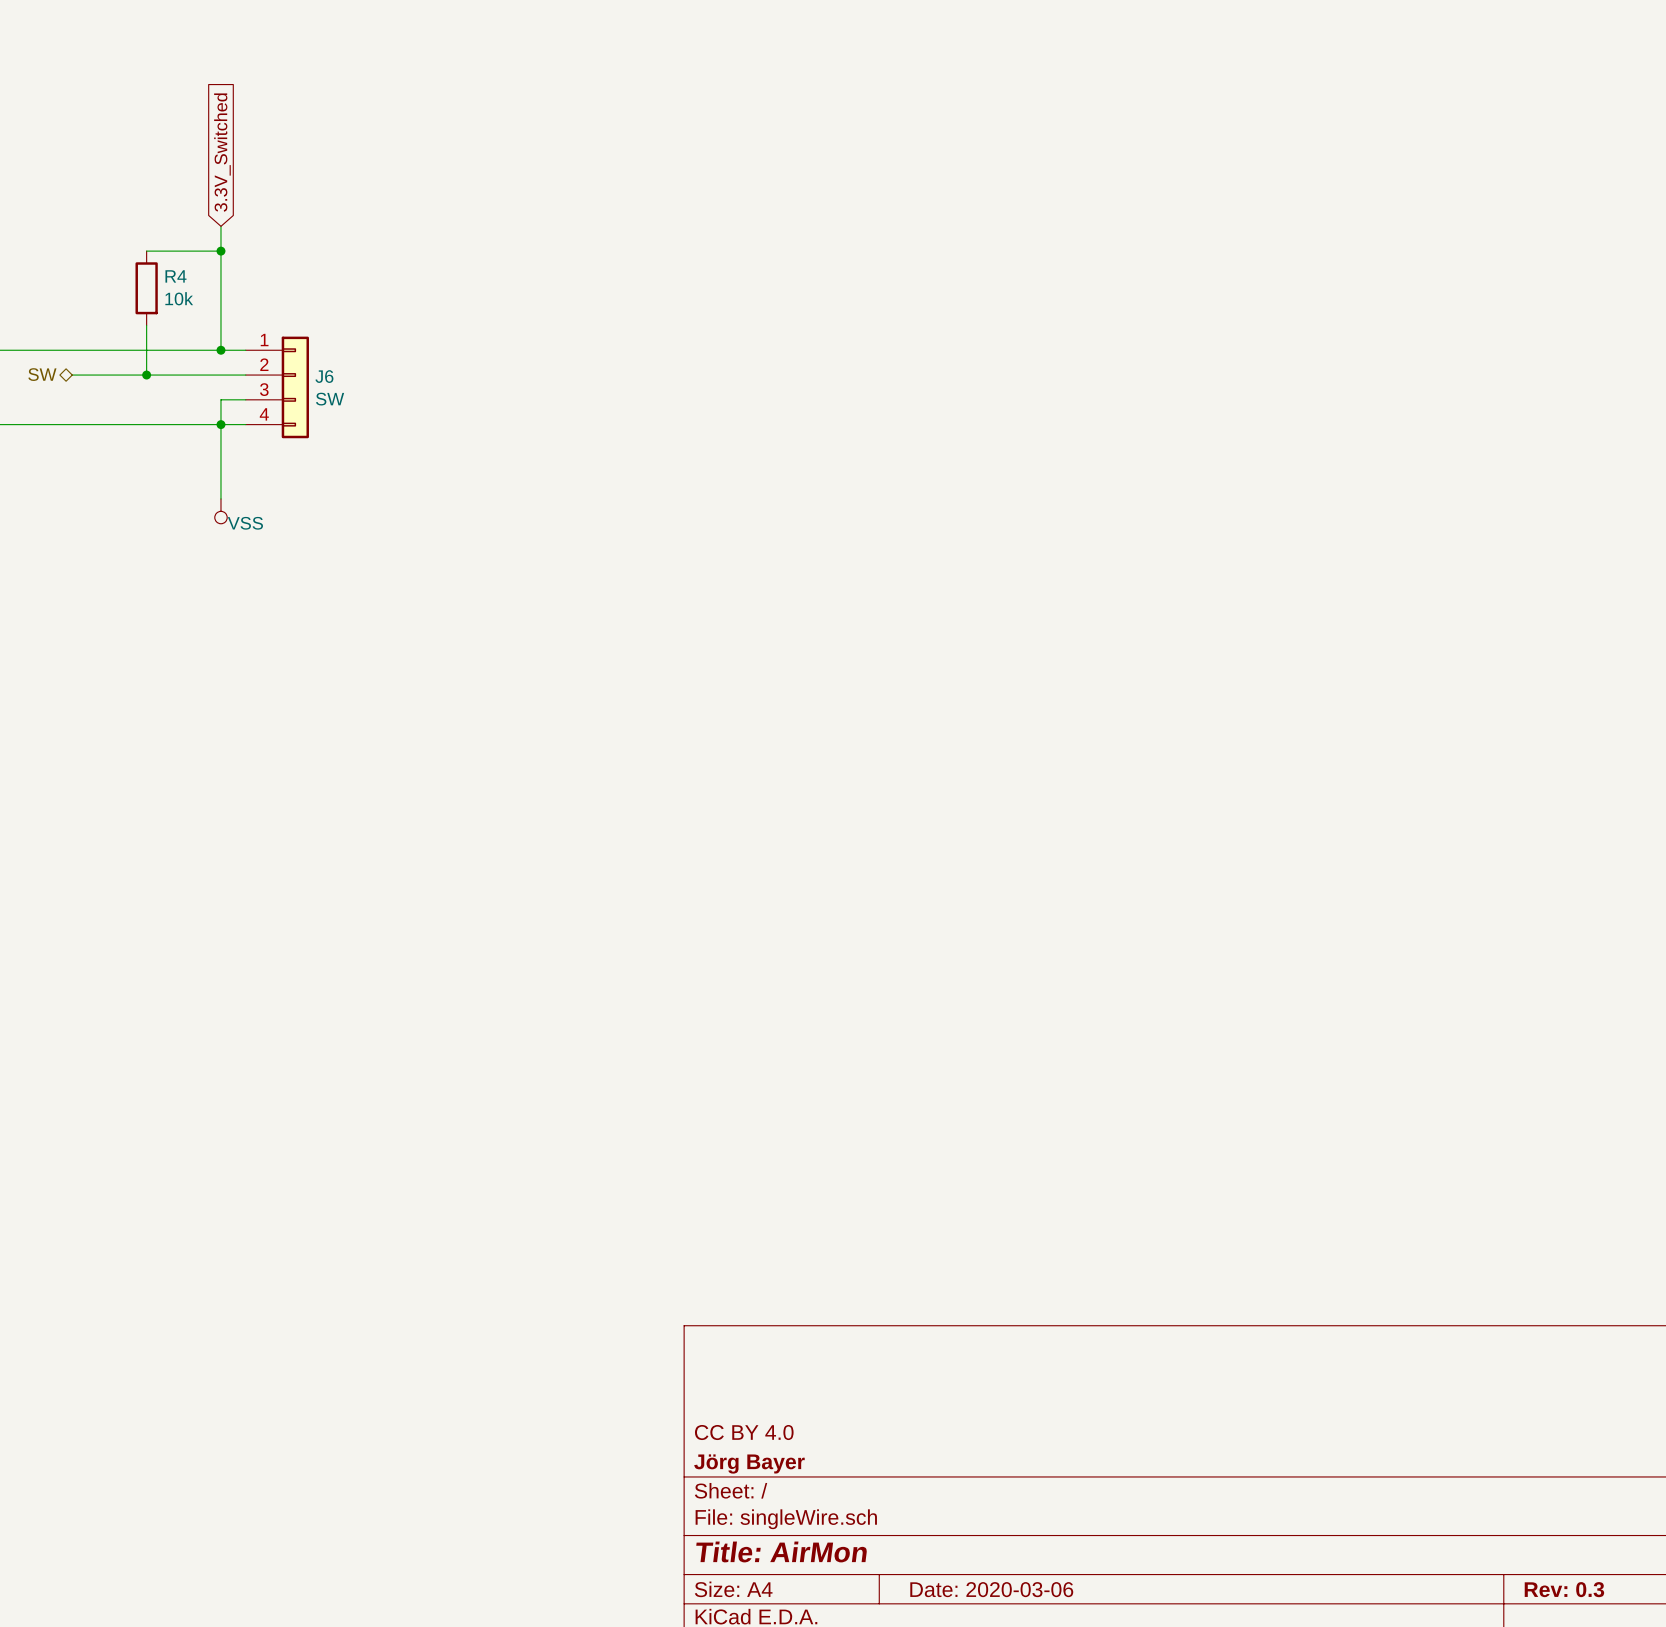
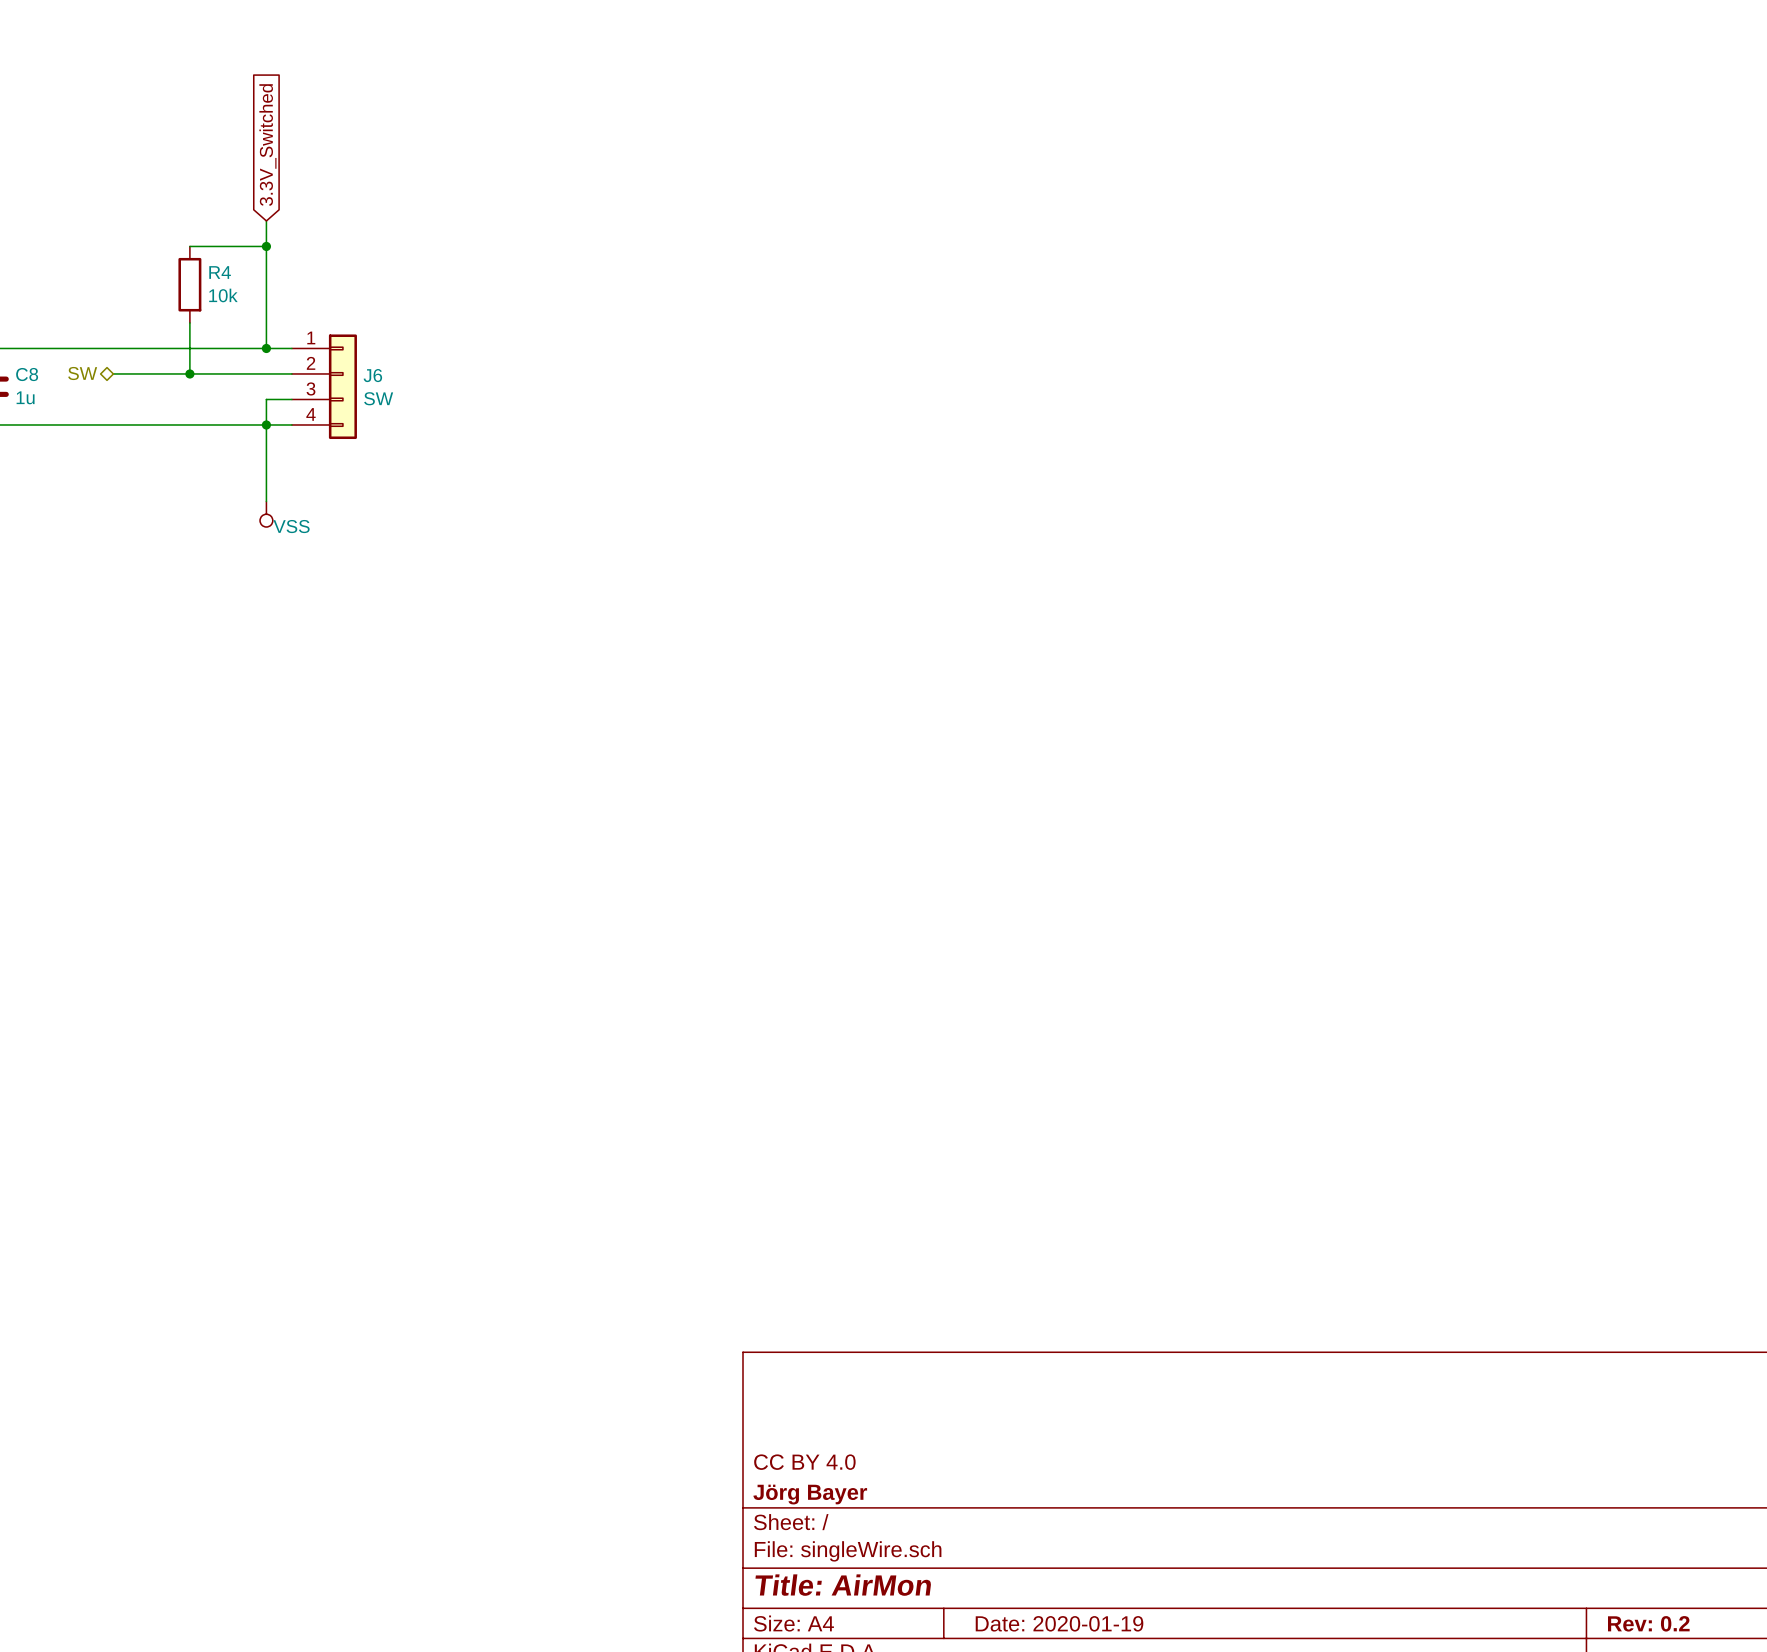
title block: Date: 2020-03-06 (991, 1589) -> Date: 2020-01-19 (1059, 1623)
title block: Rev: 0.3 (1564, 1589) -> Rev: 0.2 (1648, 1623)

